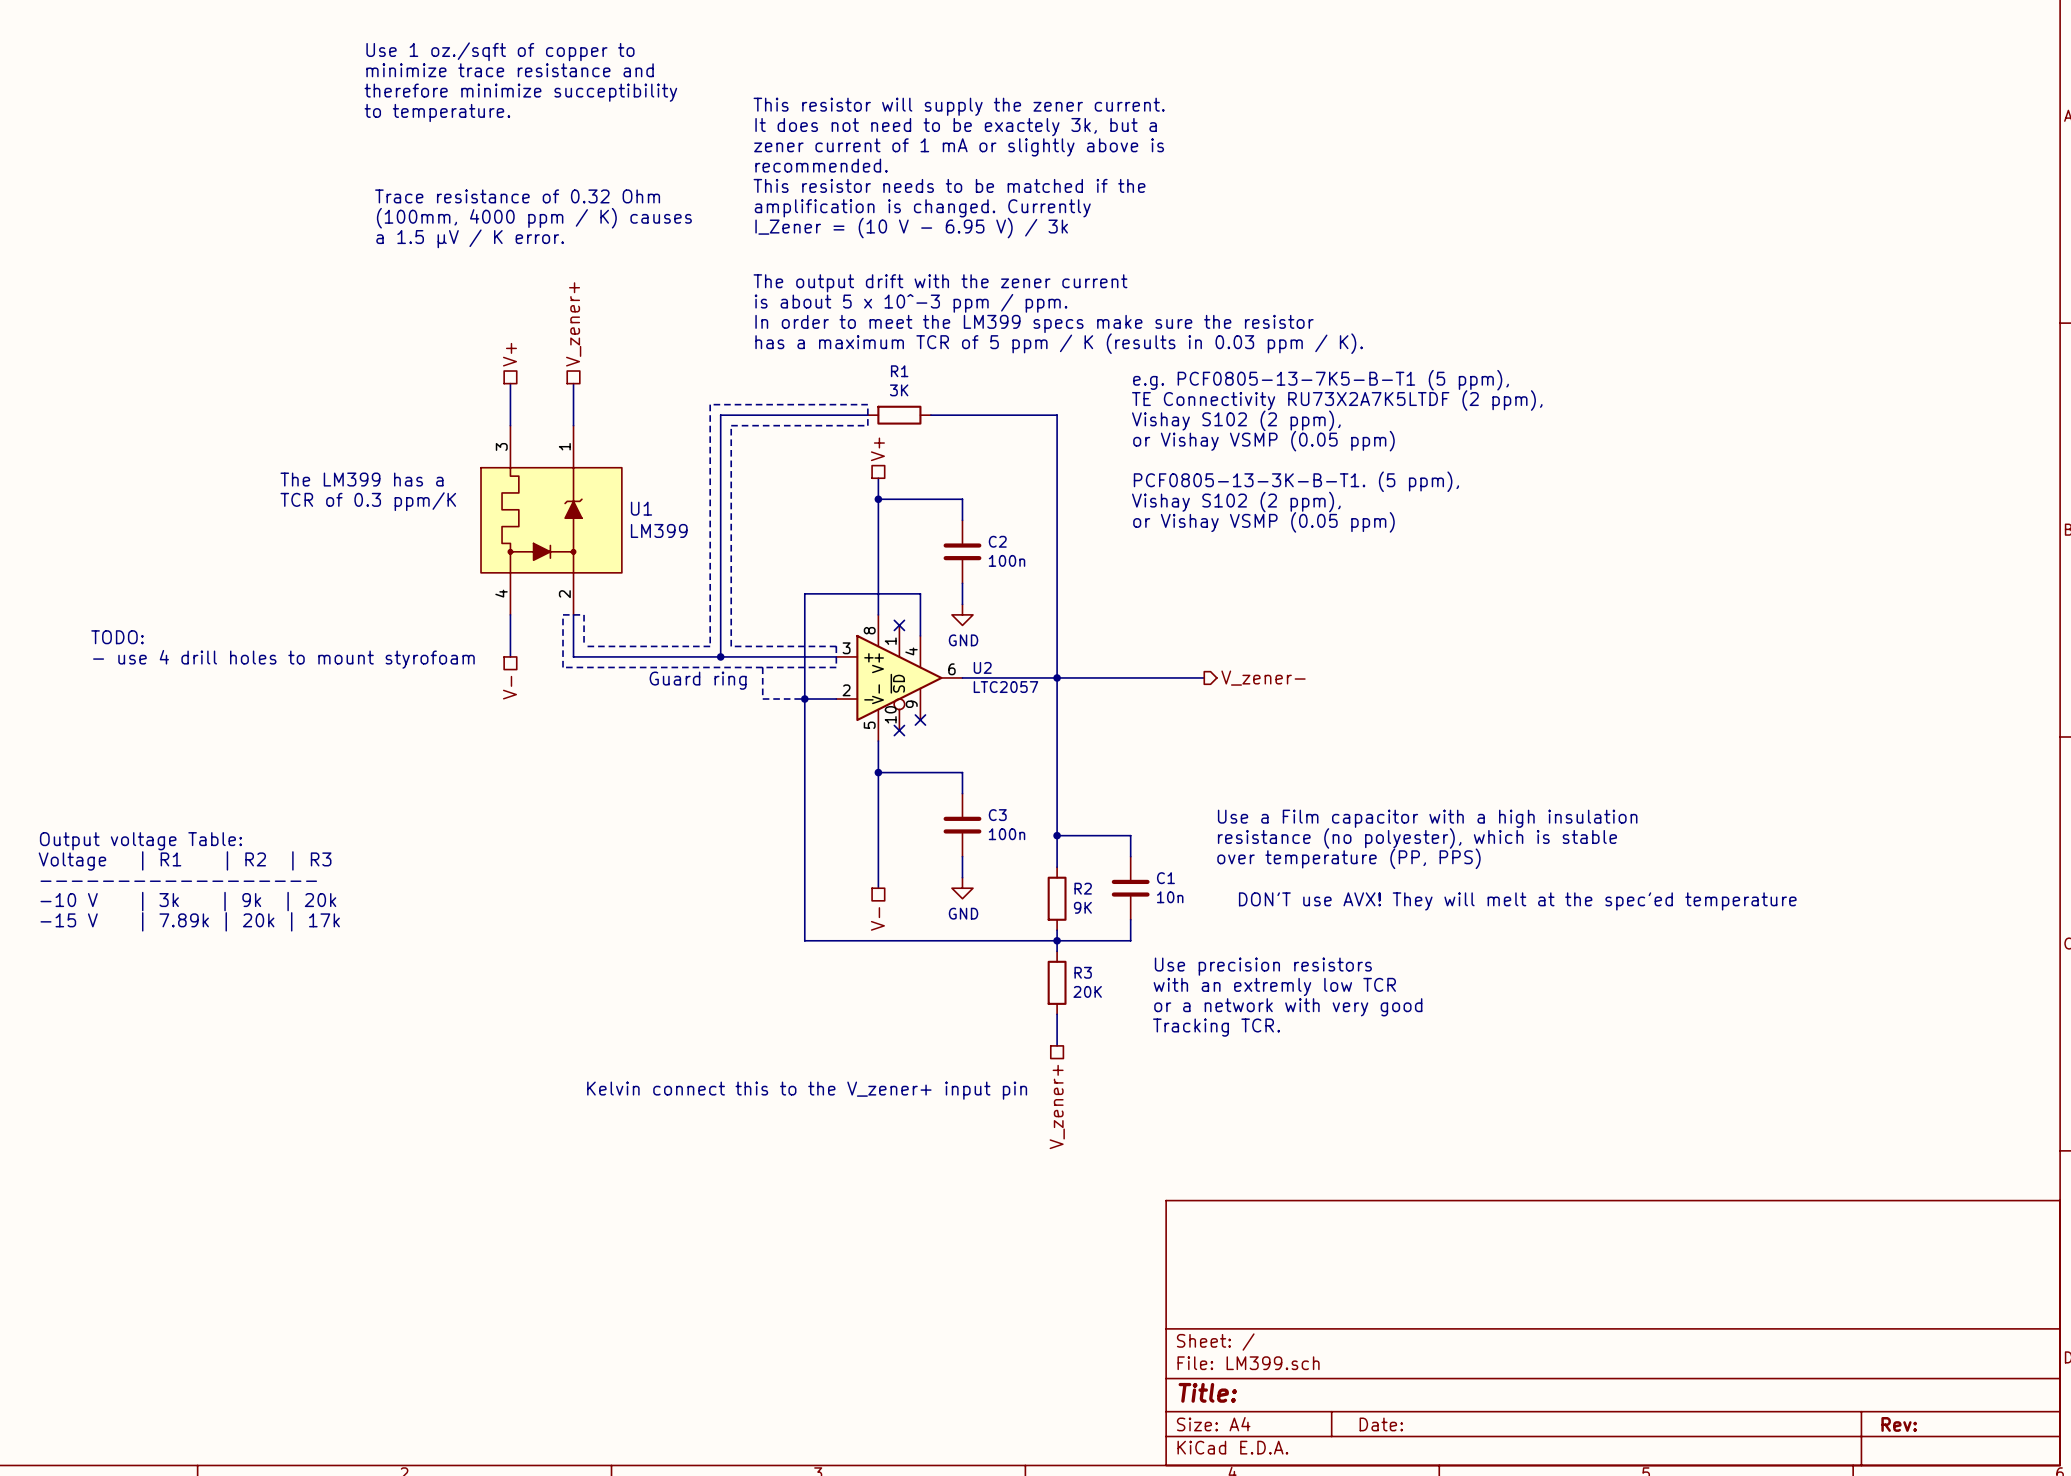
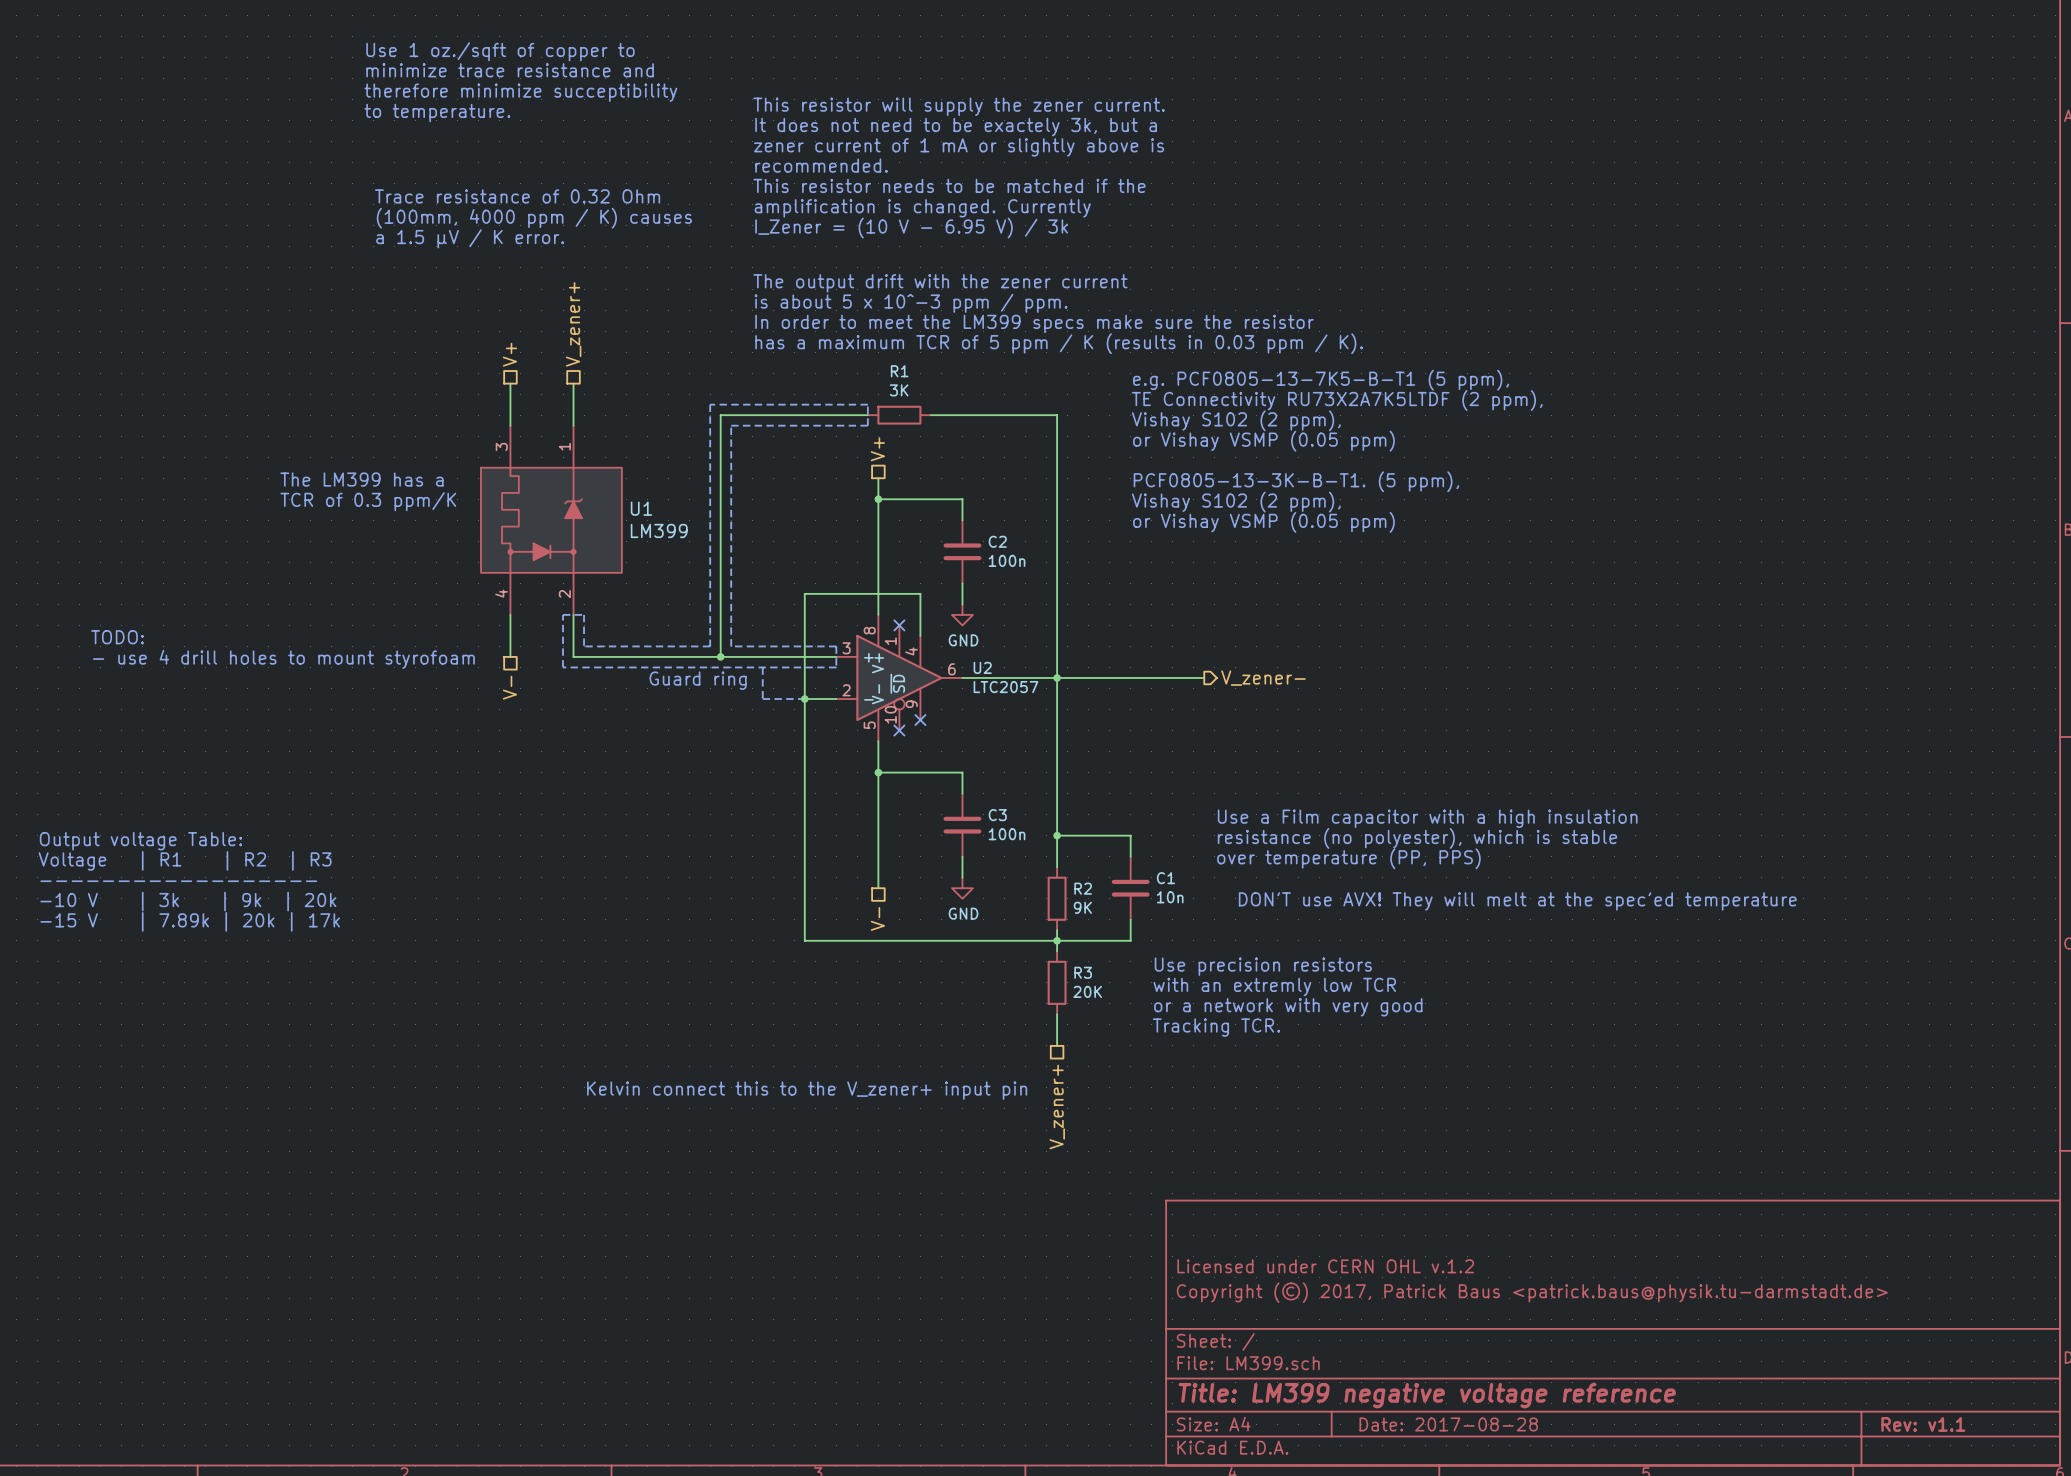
title block: none -> Licensed under CERN OHL v.1.2 (1325, 1266)
title block: none -> Copyright (©) 2017, Patrick Baus <patrick.baus@physik.tu-darmstadt.de> (1532, 1292)
title block: Title: (1207, 1392) -> Title: LM399 negative voltage reference (1427, 1395)
title block: Date: (1381, 1424) -> Date: 2017-08-28 (1448, 1424)
title block: Rev: (1899, 1424) -> Rev: v1.1 (1923, 1424)

